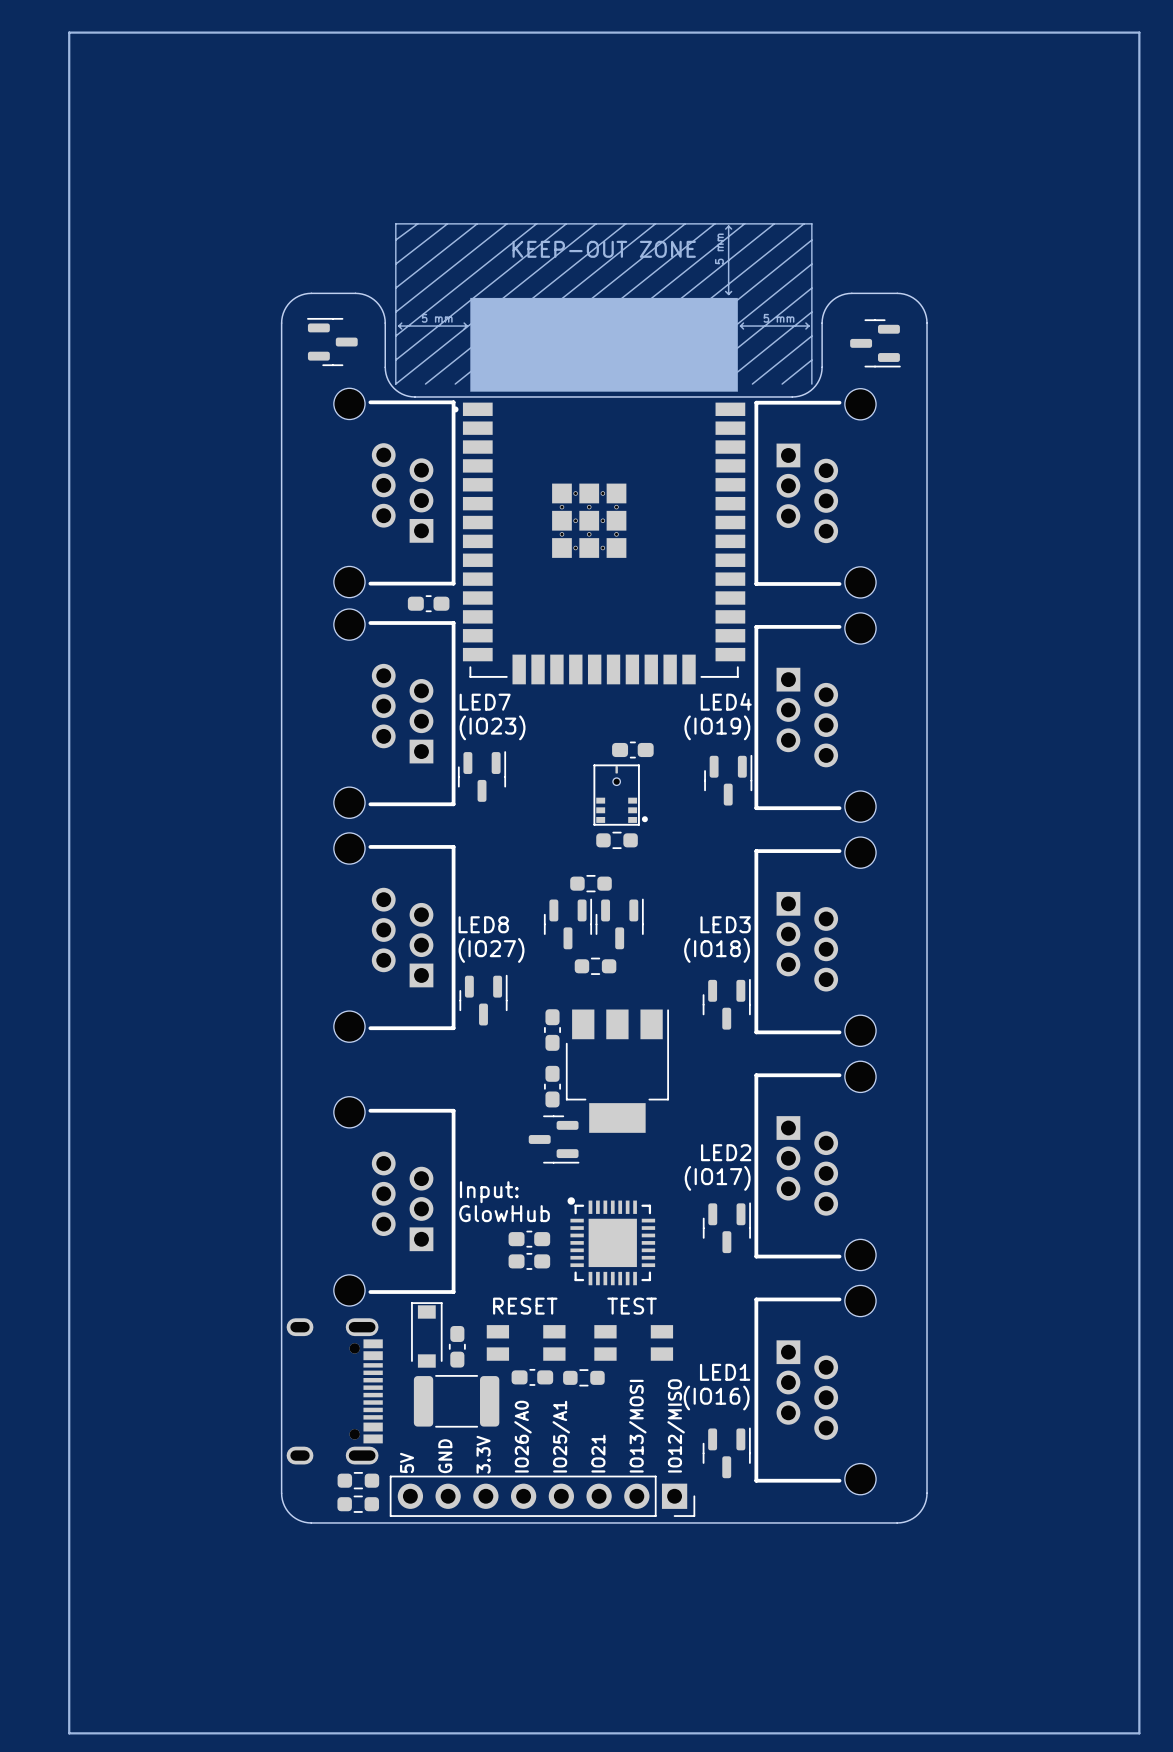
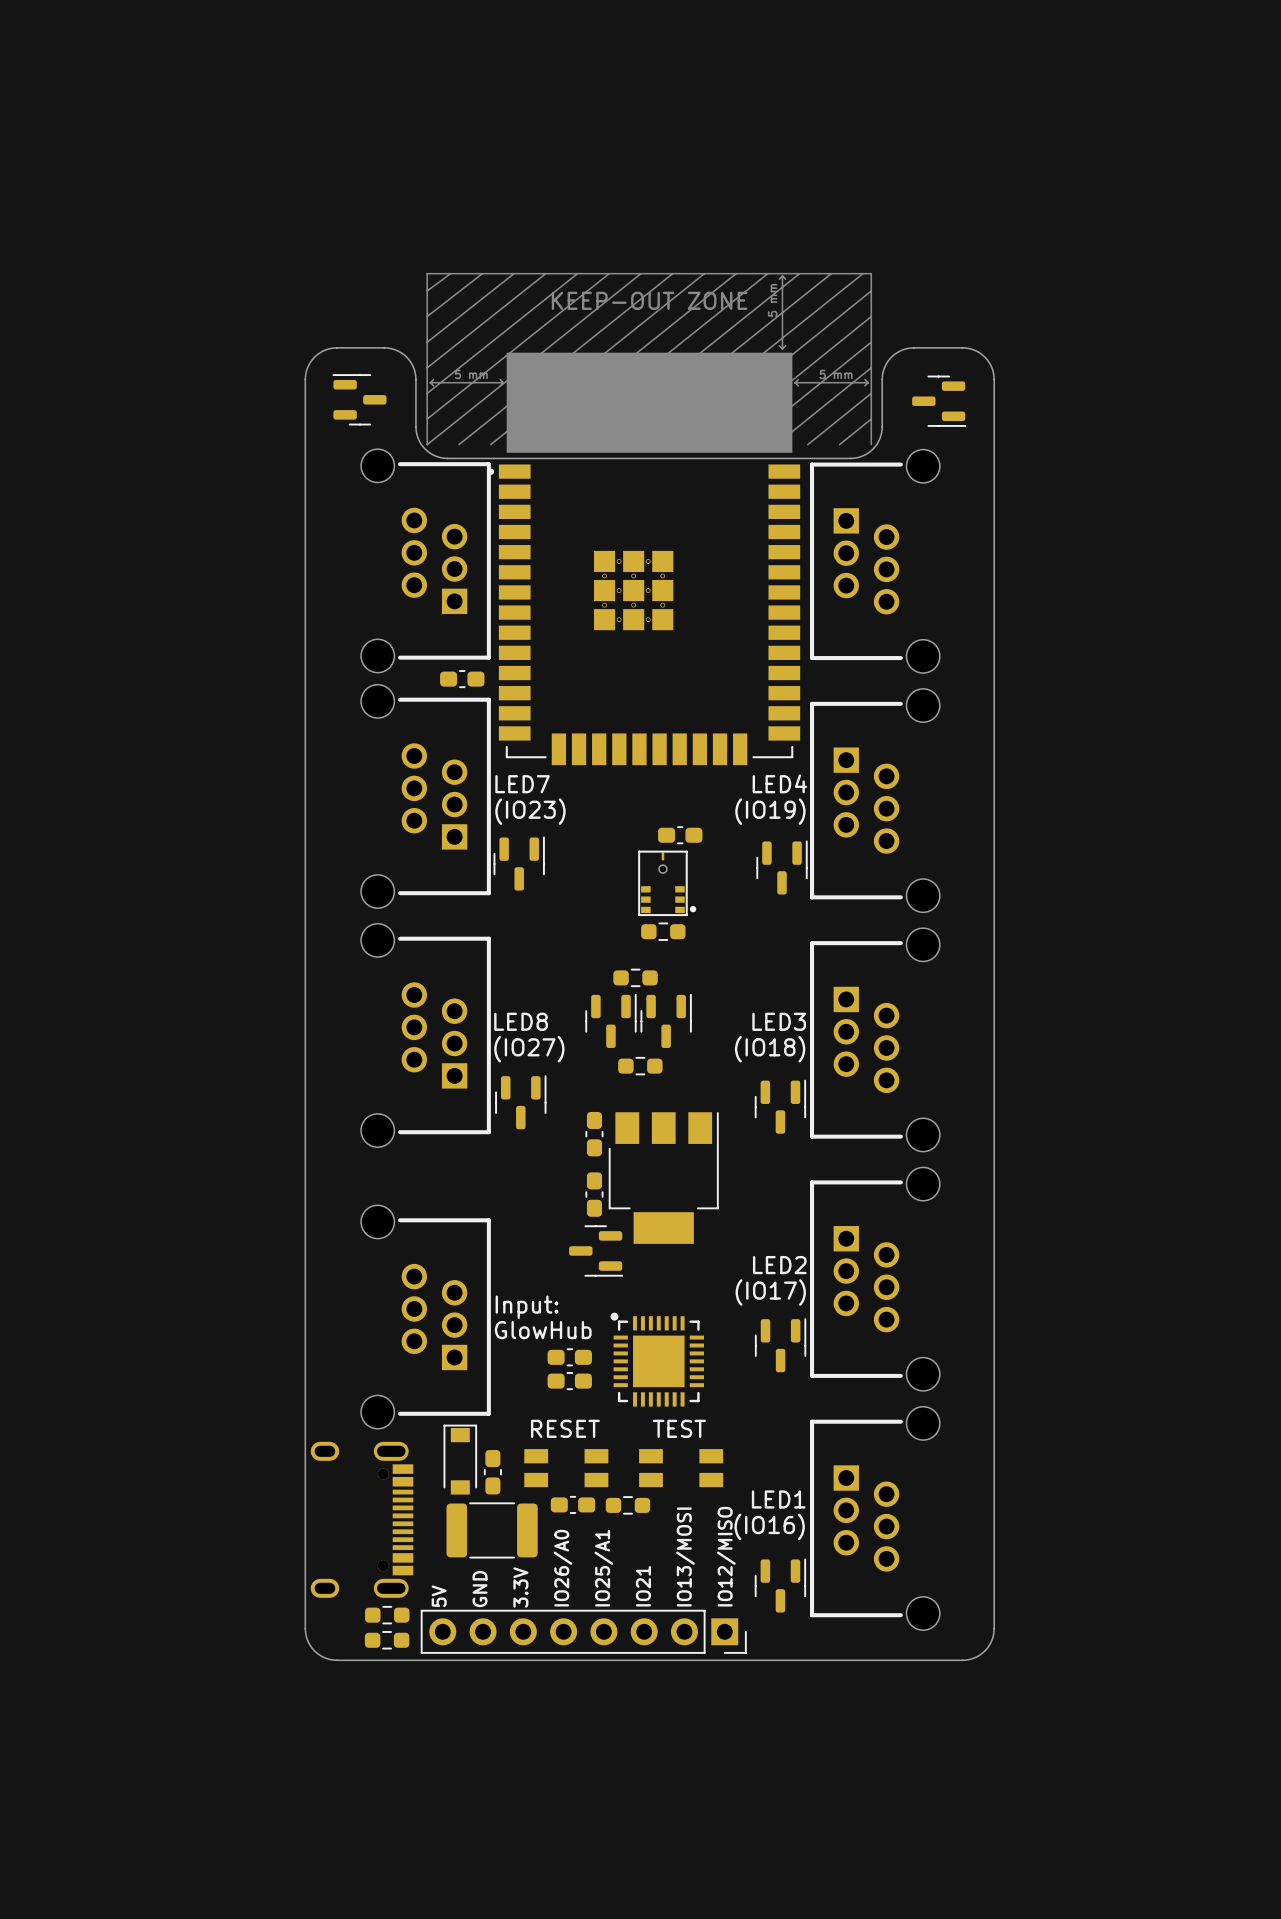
line: (69, 32) (1139, 32) (1139, 1733) (69, 1733) (69, 32) -> none

